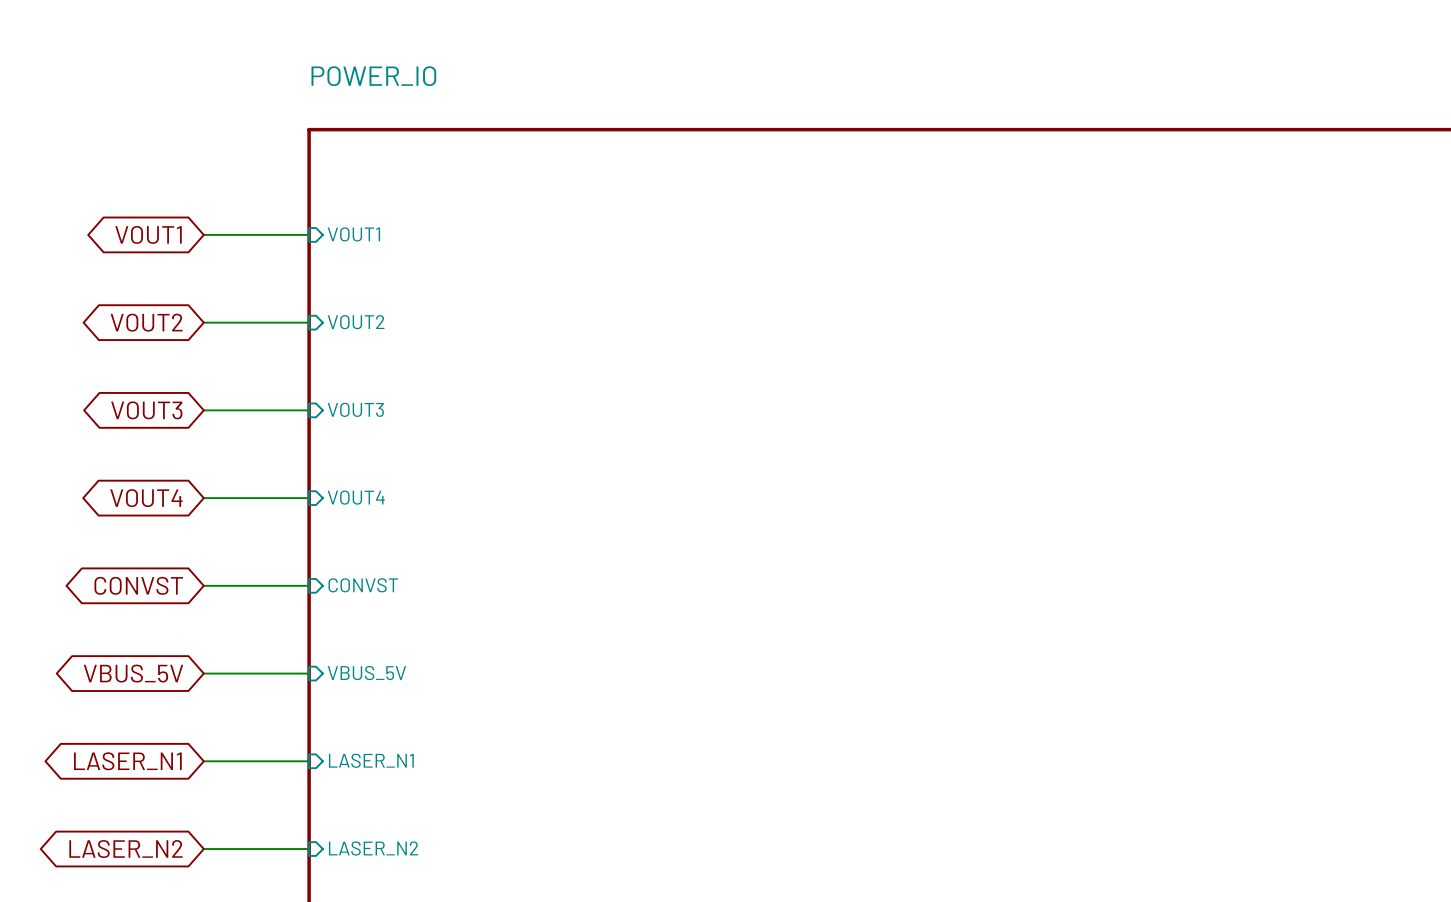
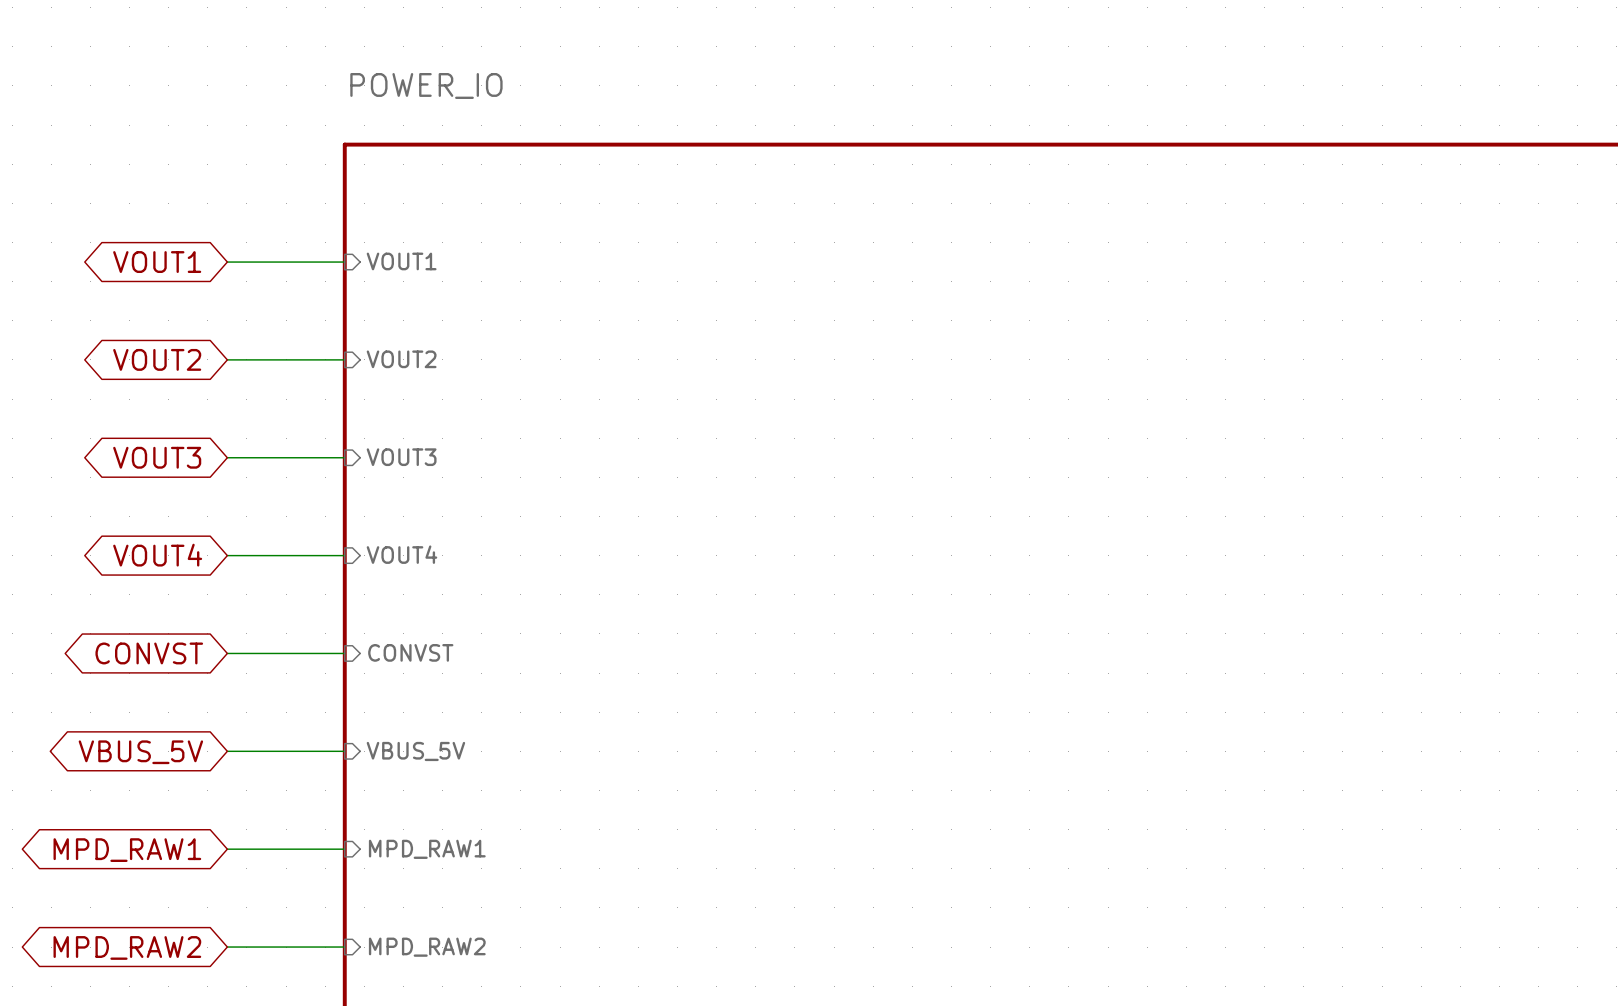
sheet pin: LASER_N1 (371, 760) -> MPD_RAW1 (427, 849)
global label: LASER_N1 (127, 761) -> MPD_RAW1 (127, 850)
sheet pin: LASER_N2 (373, 848) -> MPD_RAW2 (427, 947)
global label: LASER_N2 (125, 849) -> MPD_RAW2 (127, 947)

